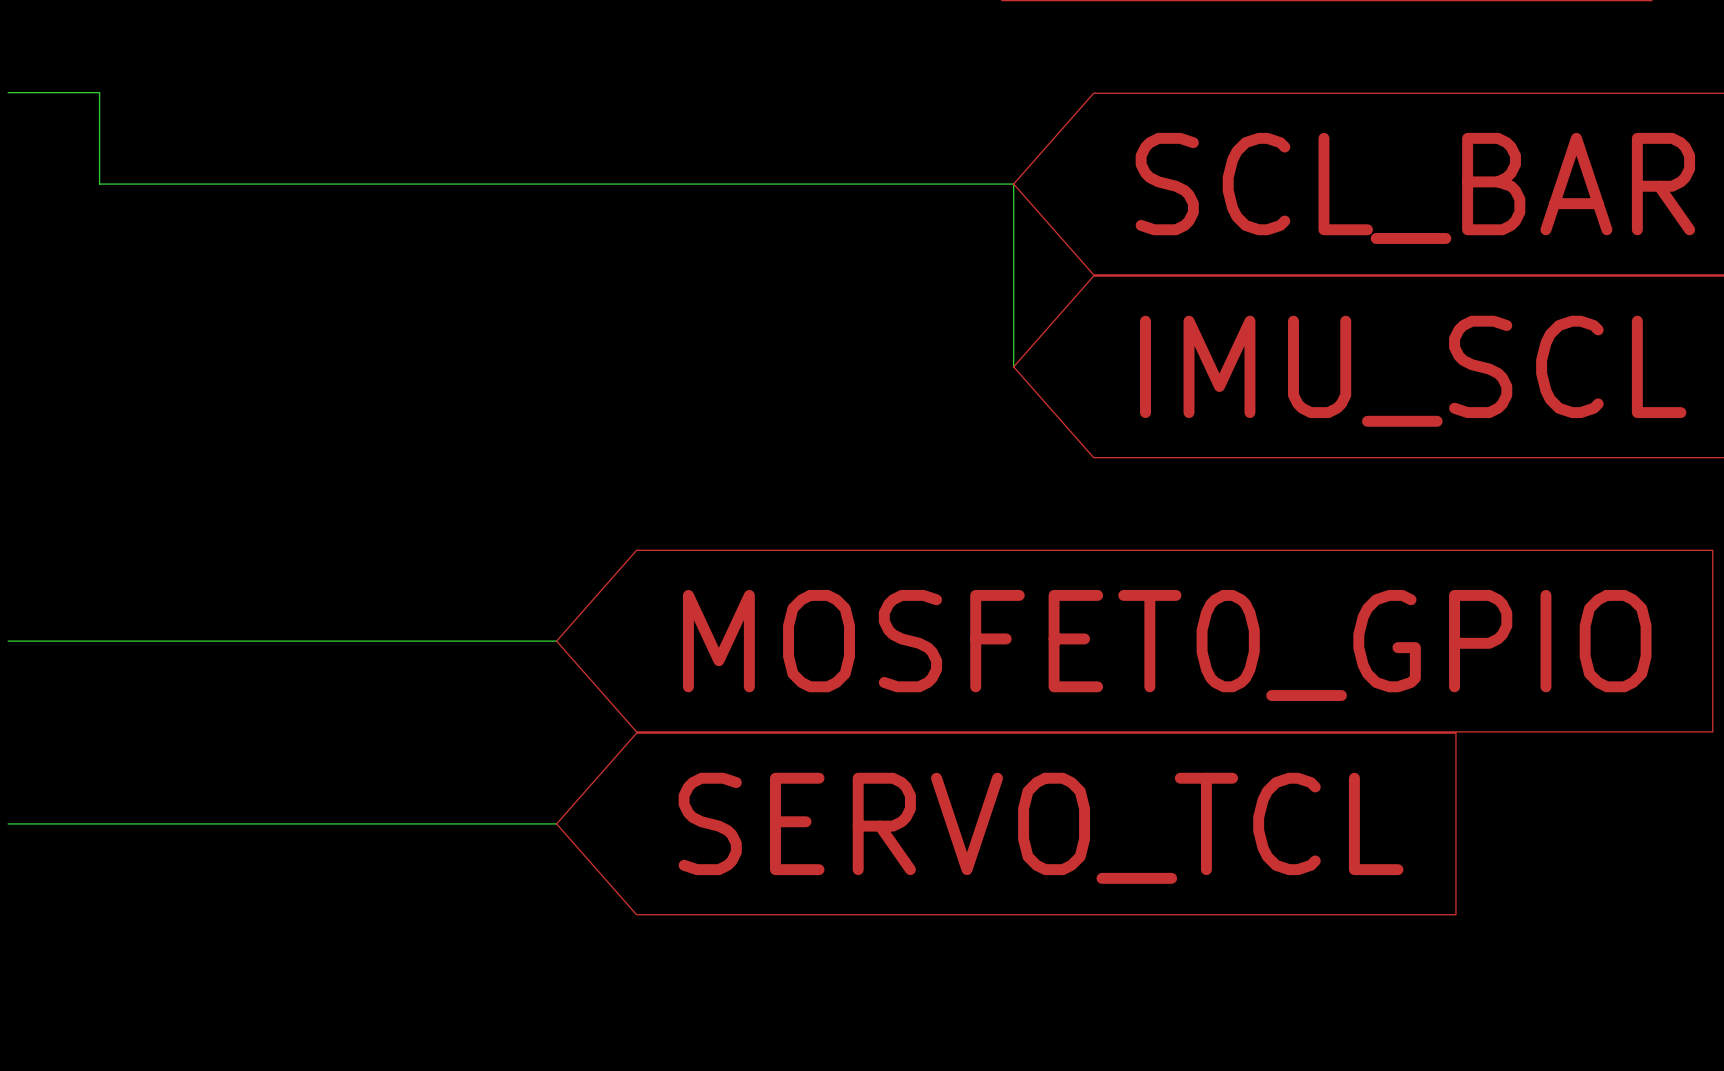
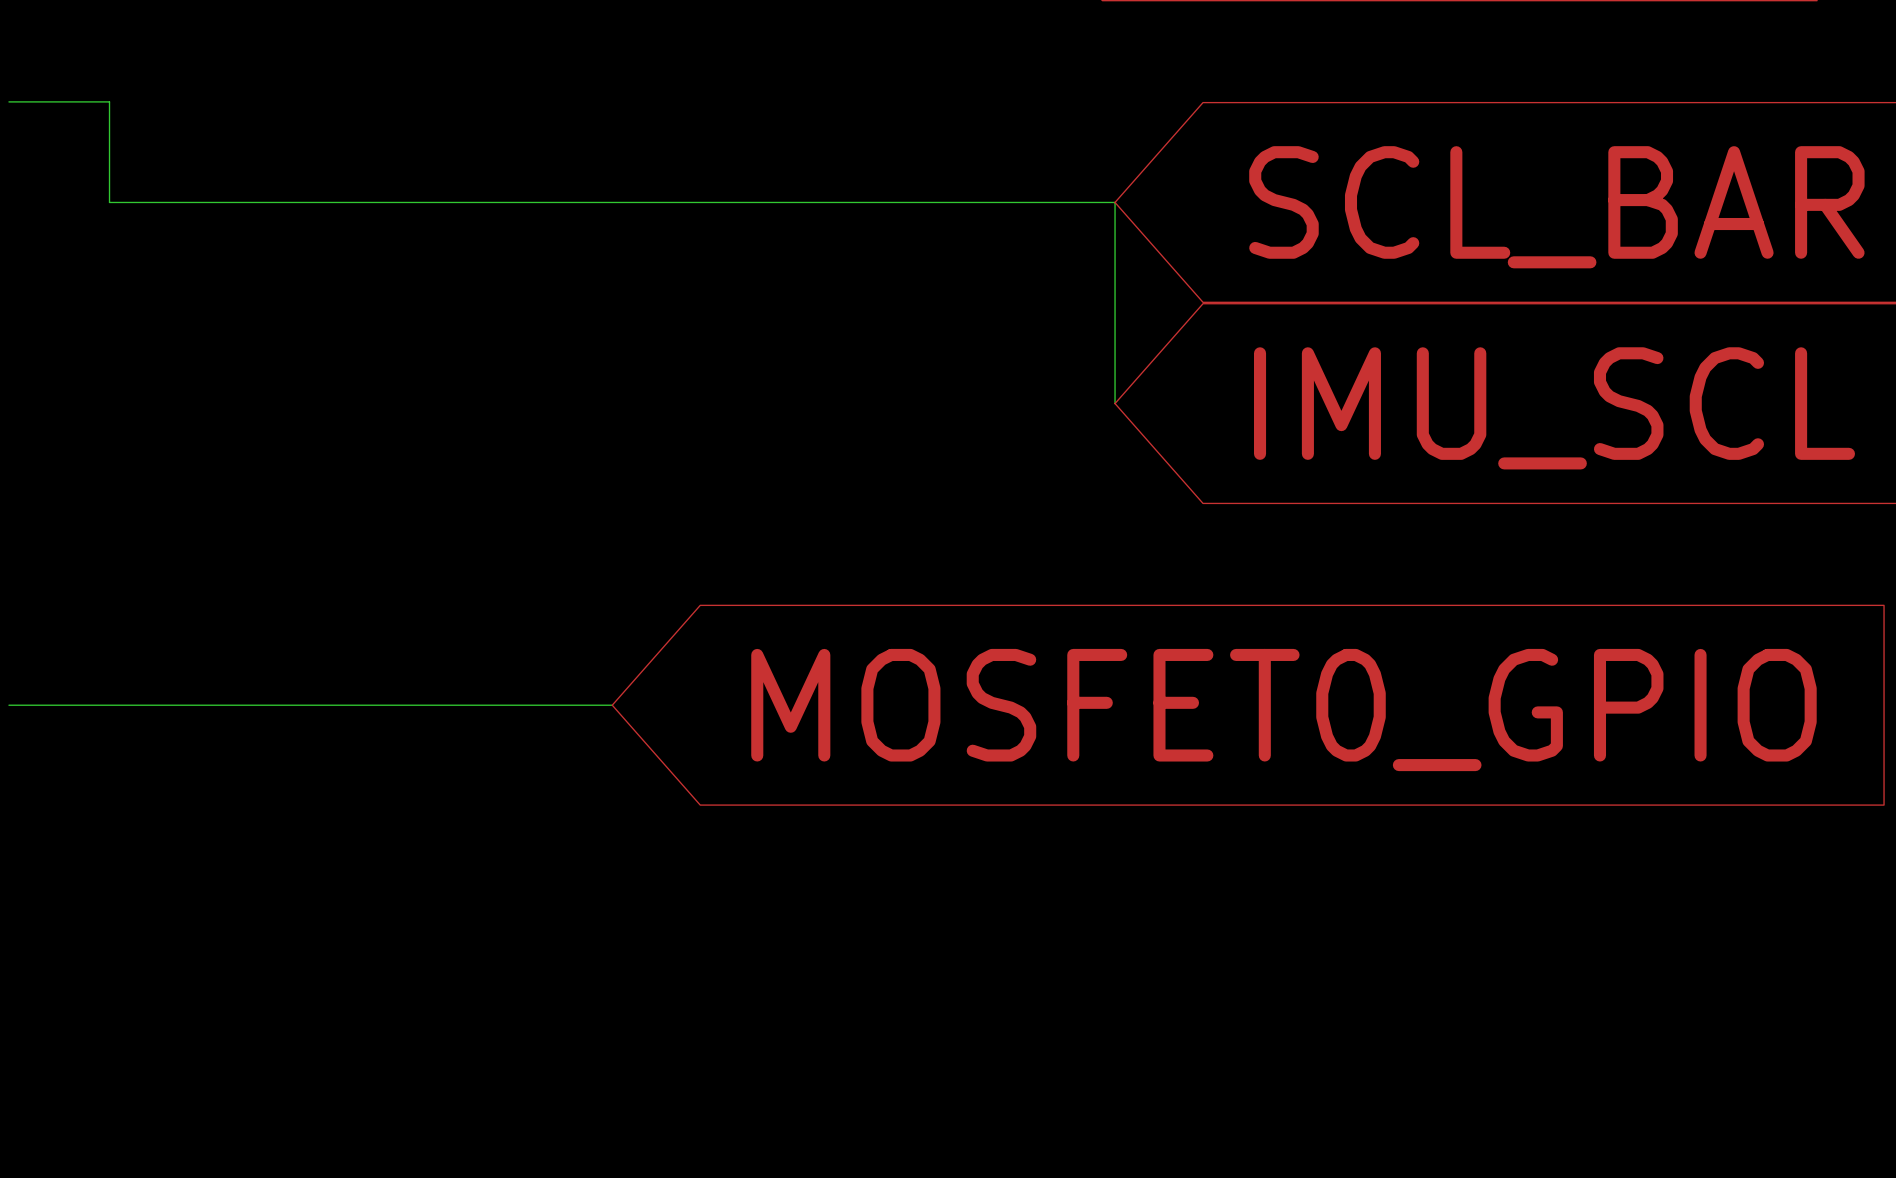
wire: (8, 823) (556, 823) -> none
global label: SERVO_TCL (1041, 828) -> none

